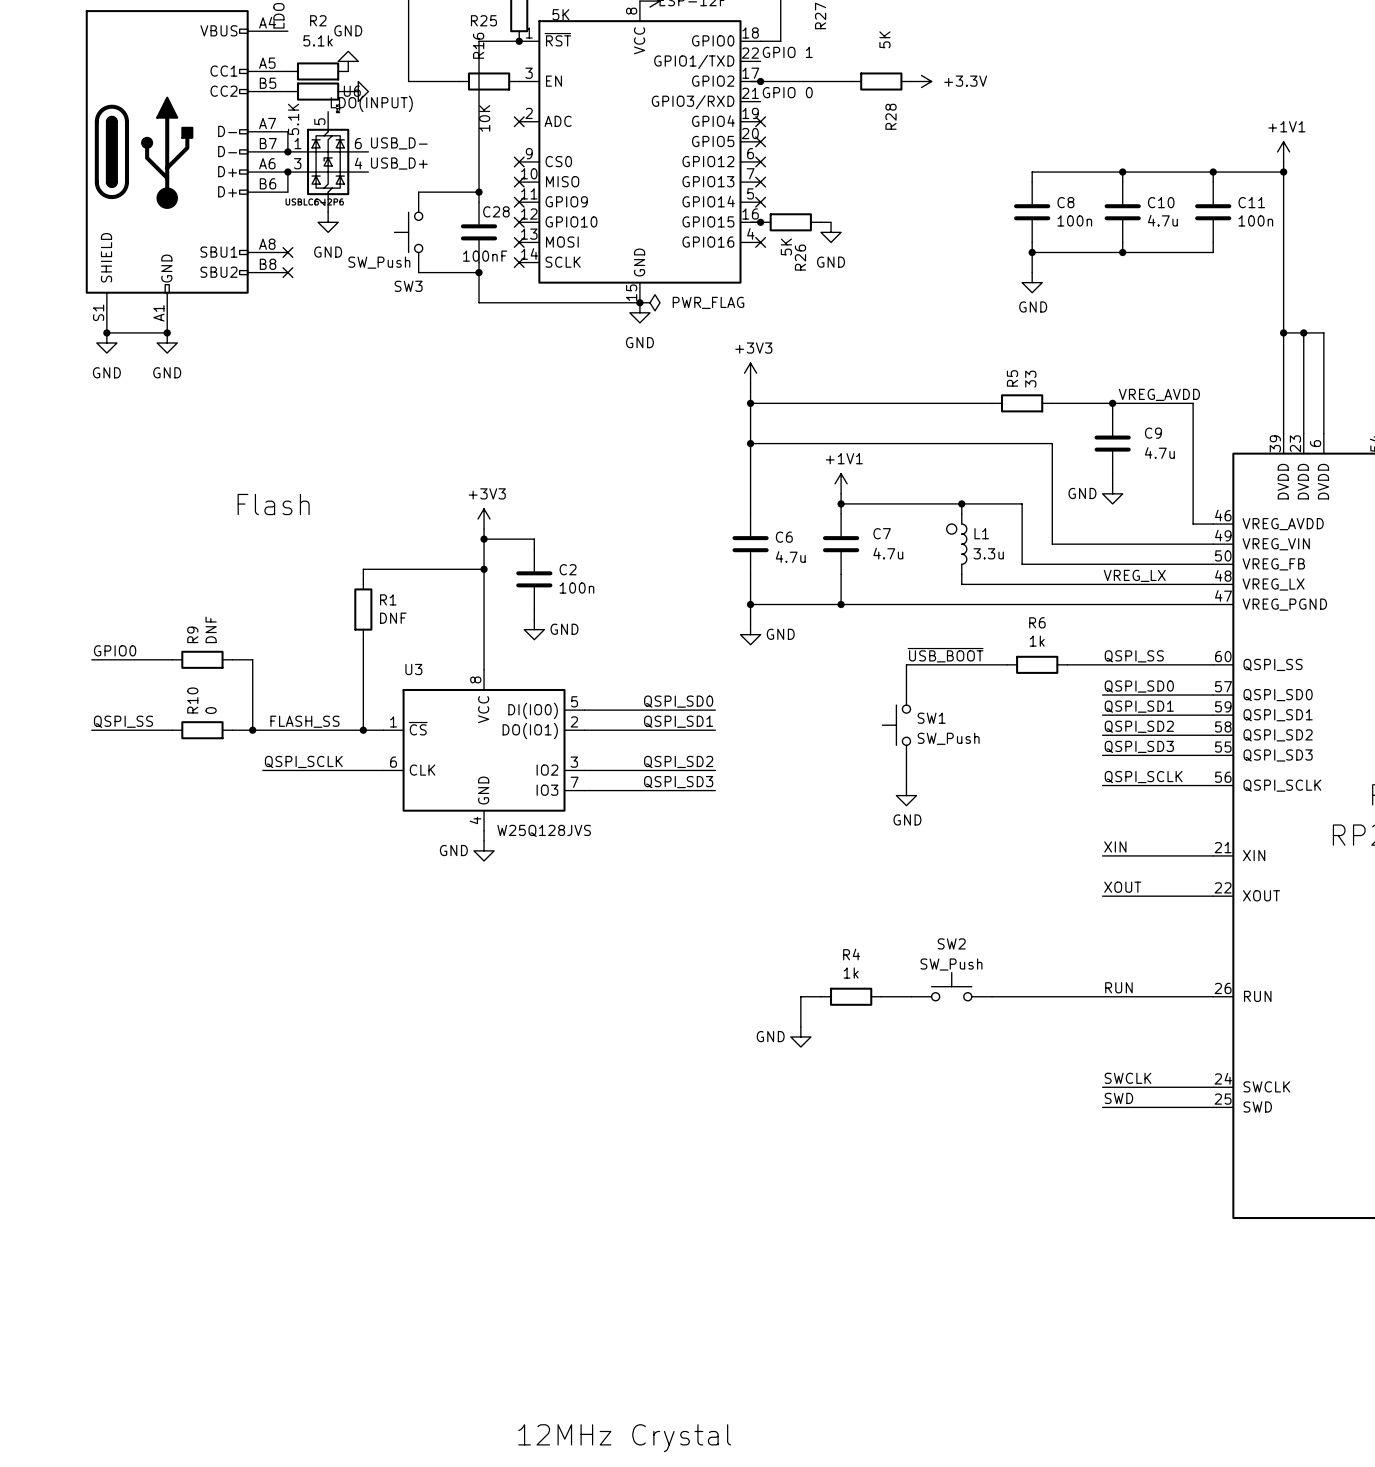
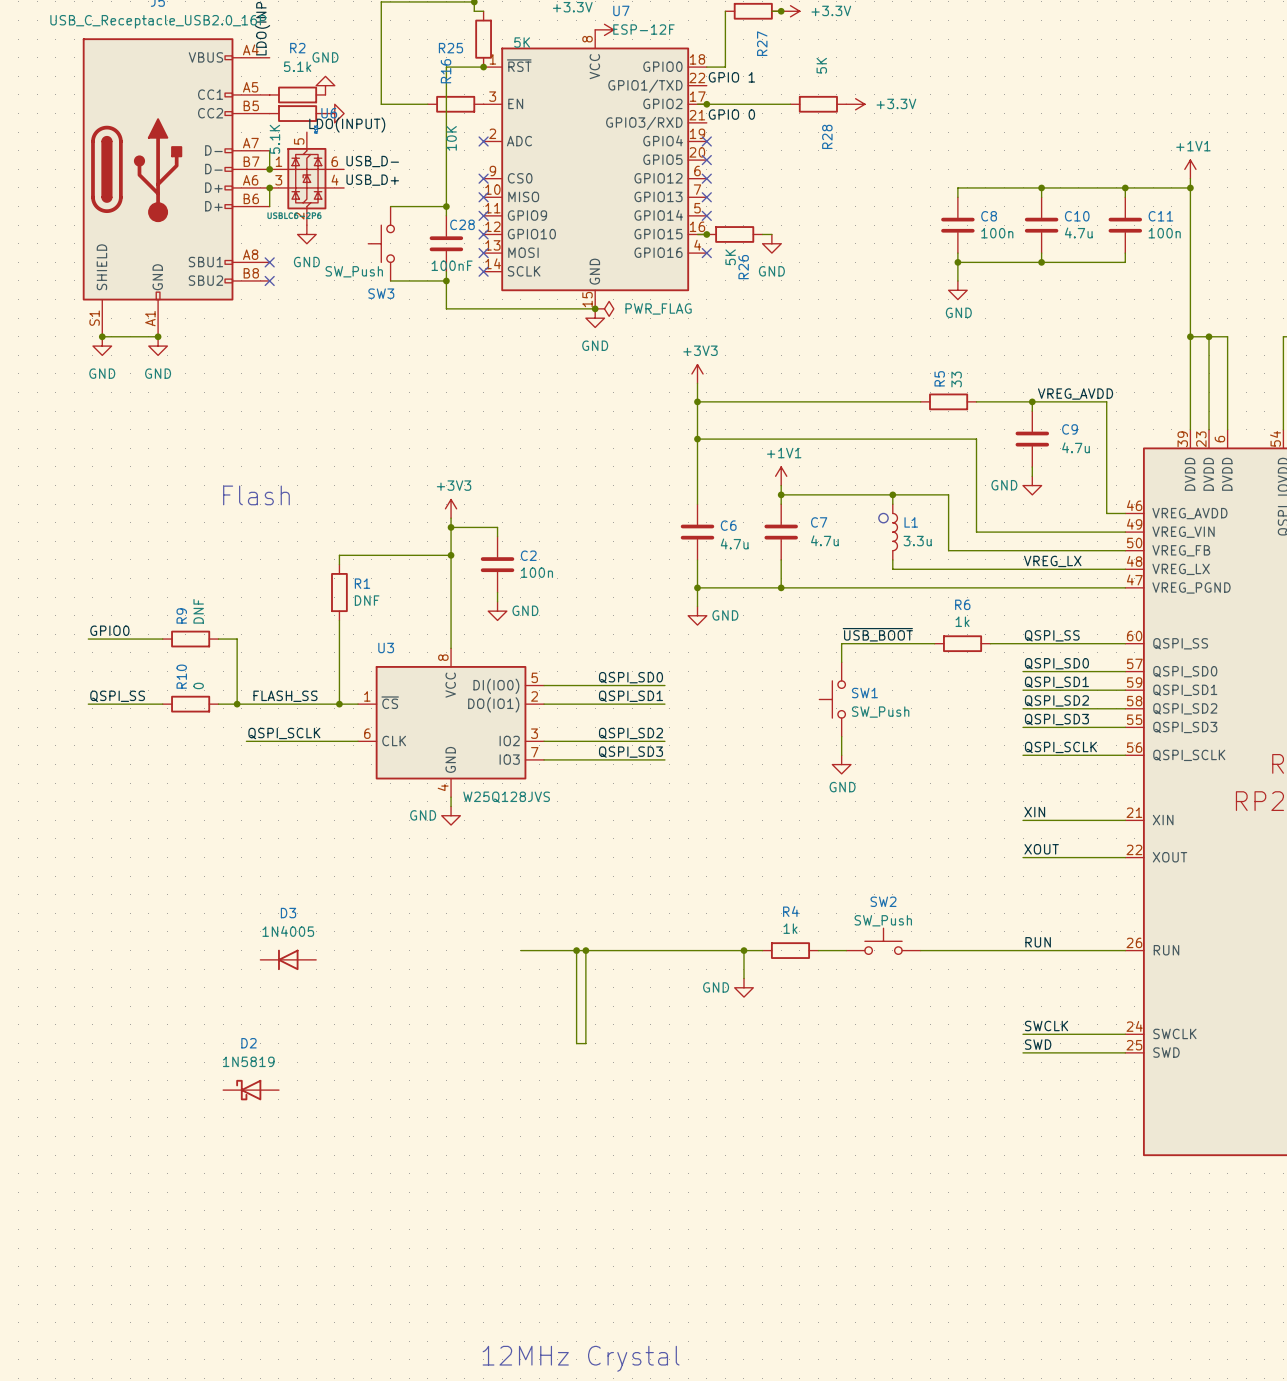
wire: none -> (520, 950) (743, 950)
wire: none -> (576, 950) (576, 1043) (585, 1043) (585, 950)
junction: none -> (576, 950)
junction: none -> (585, 950)
junction: none -> (743, 950)
D3: none -> 1N4005 (288, 959)
D2: none -> 1N5819 (251, 1090)

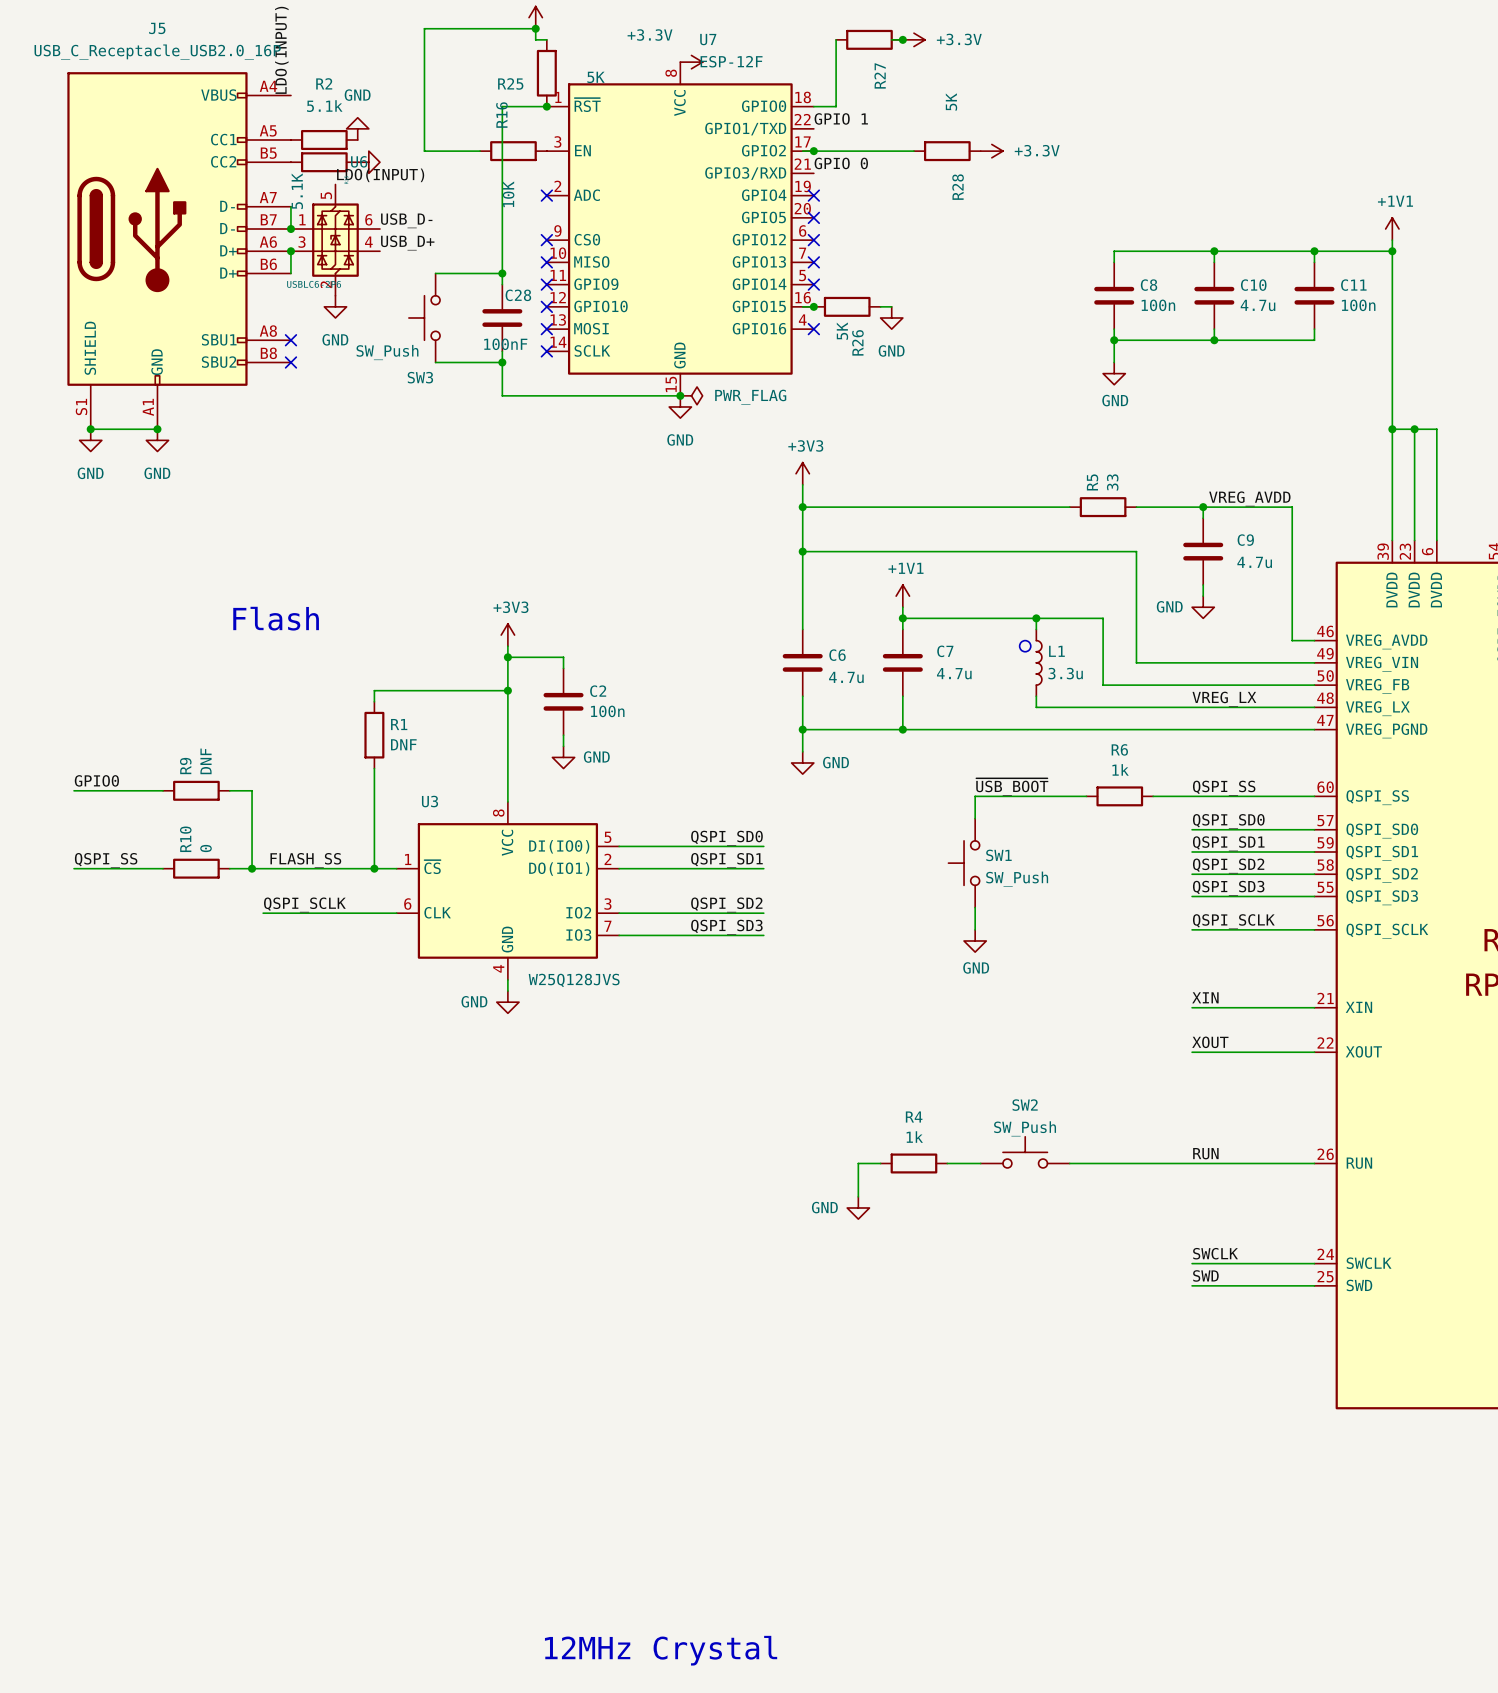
wire: (520, 950) (743, 950) -> none
wire: (576, 950) (576, 1043) (585, 1043) (585, 950) -> none
junction: (576, 950) -> none
junction: (585, 950) -> none
junction: (743, 950) -> none
D3: 1N4005 (288, 959) -> none
D2: 1N5819 (251, 1090) -> none

